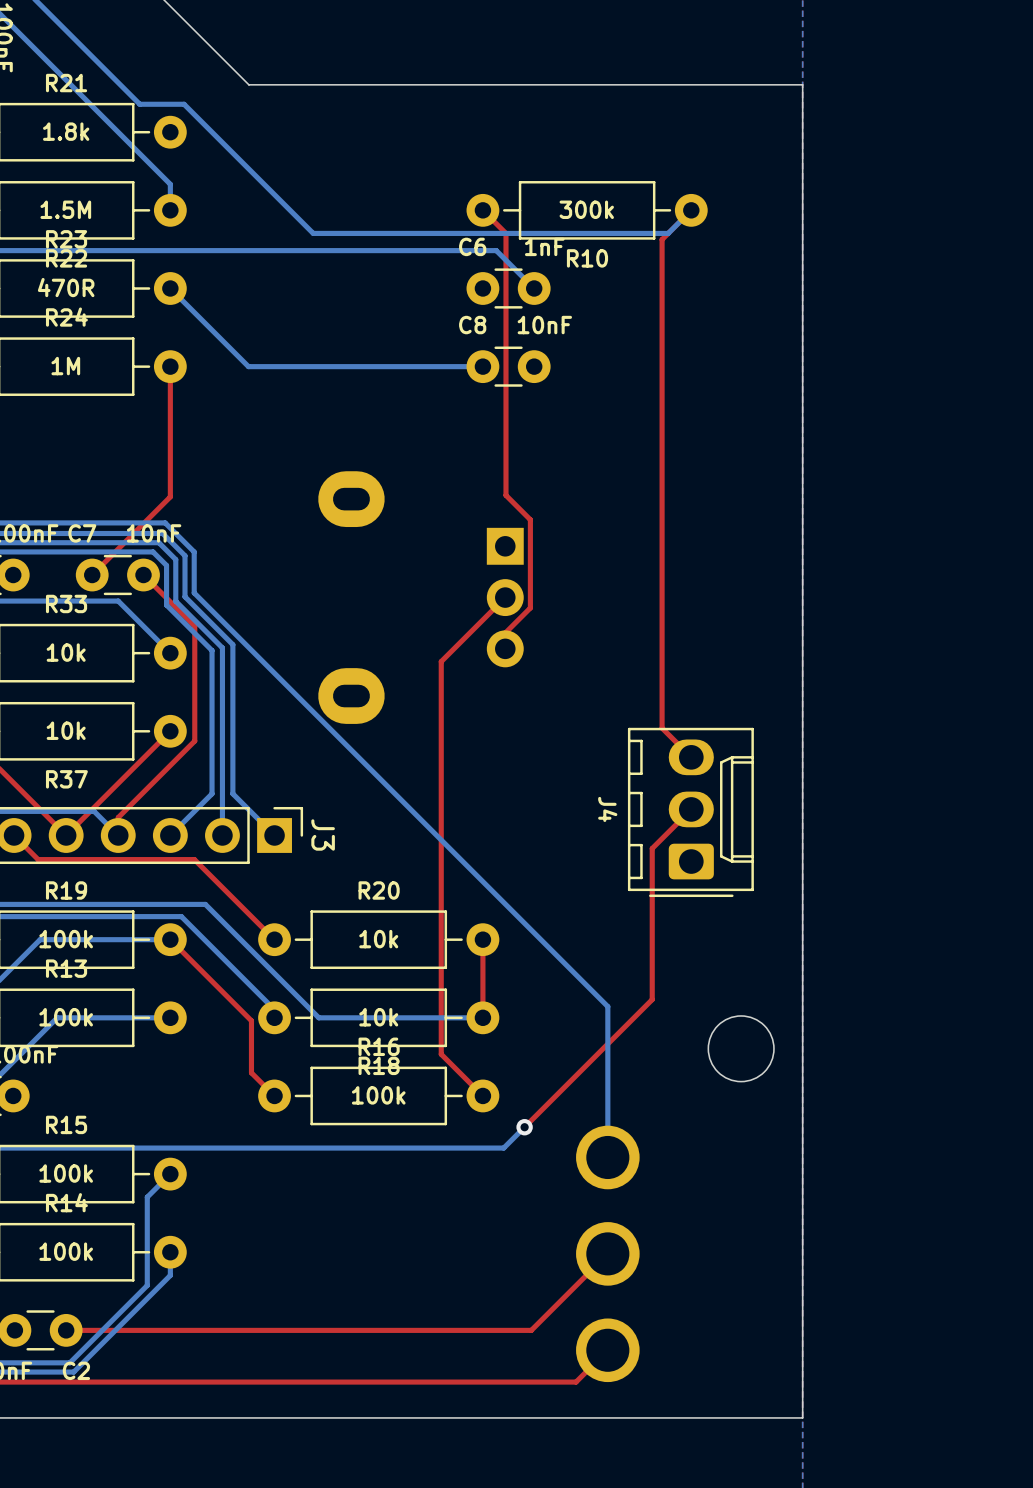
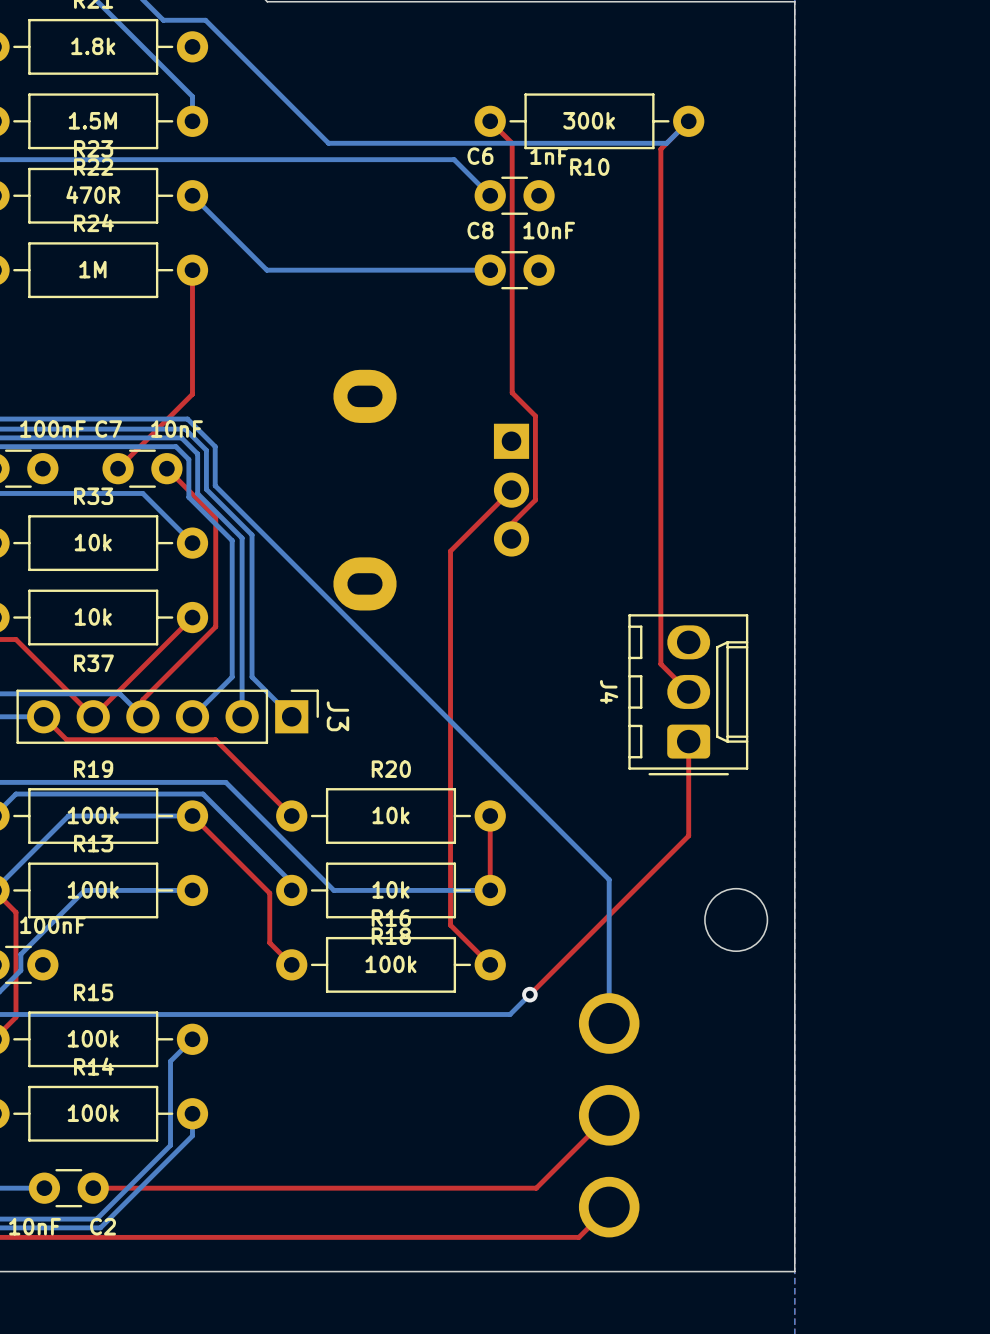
bottom track: (445, 250) (496, 250) (534, 288) -> (454, 159) (490, 195)
top track: (662, 728) (691, 757) -> (660, 614) (660, 664) (688, 691)
top track: (691, 809) (652, 848) (652, 999) -> (688, 741) (688, 835) (651, 873)

